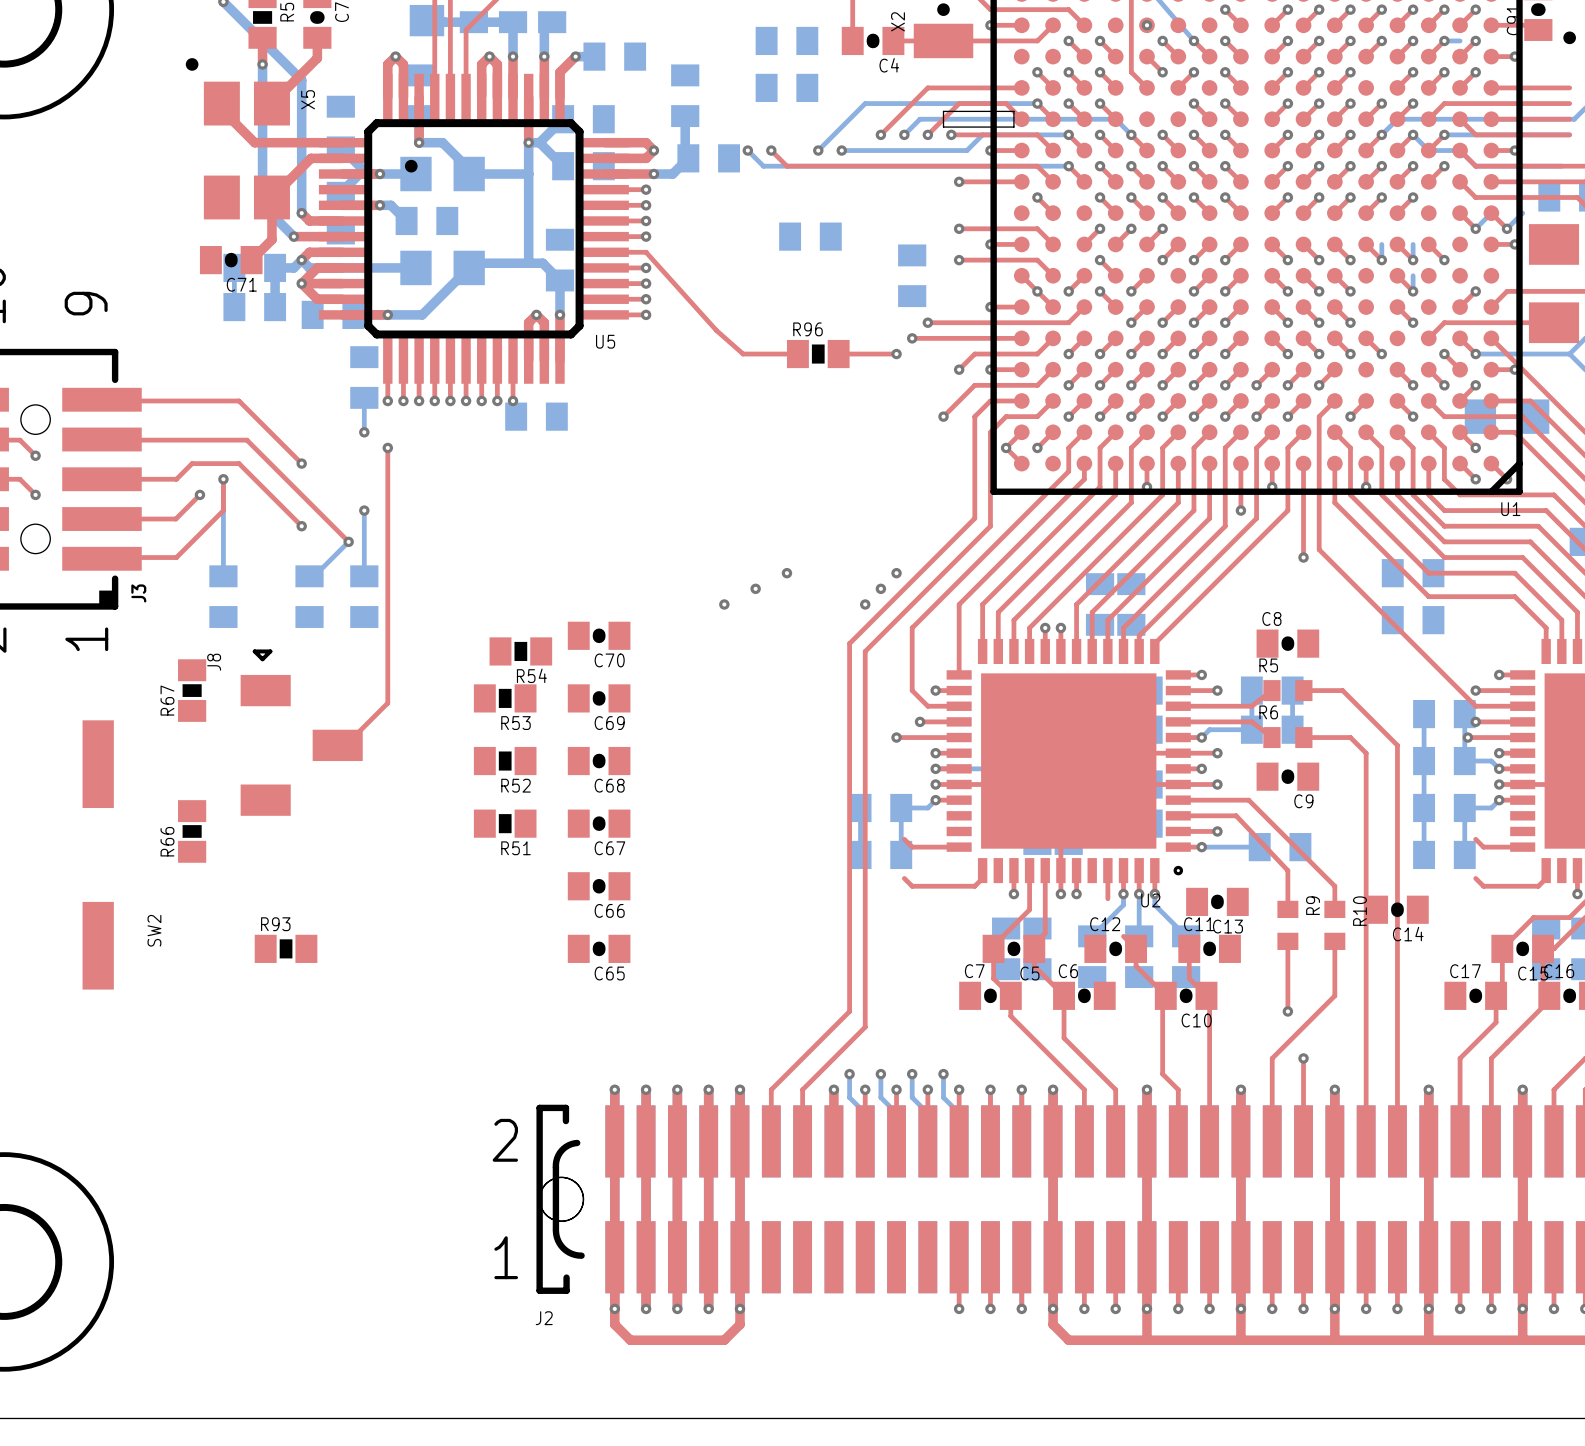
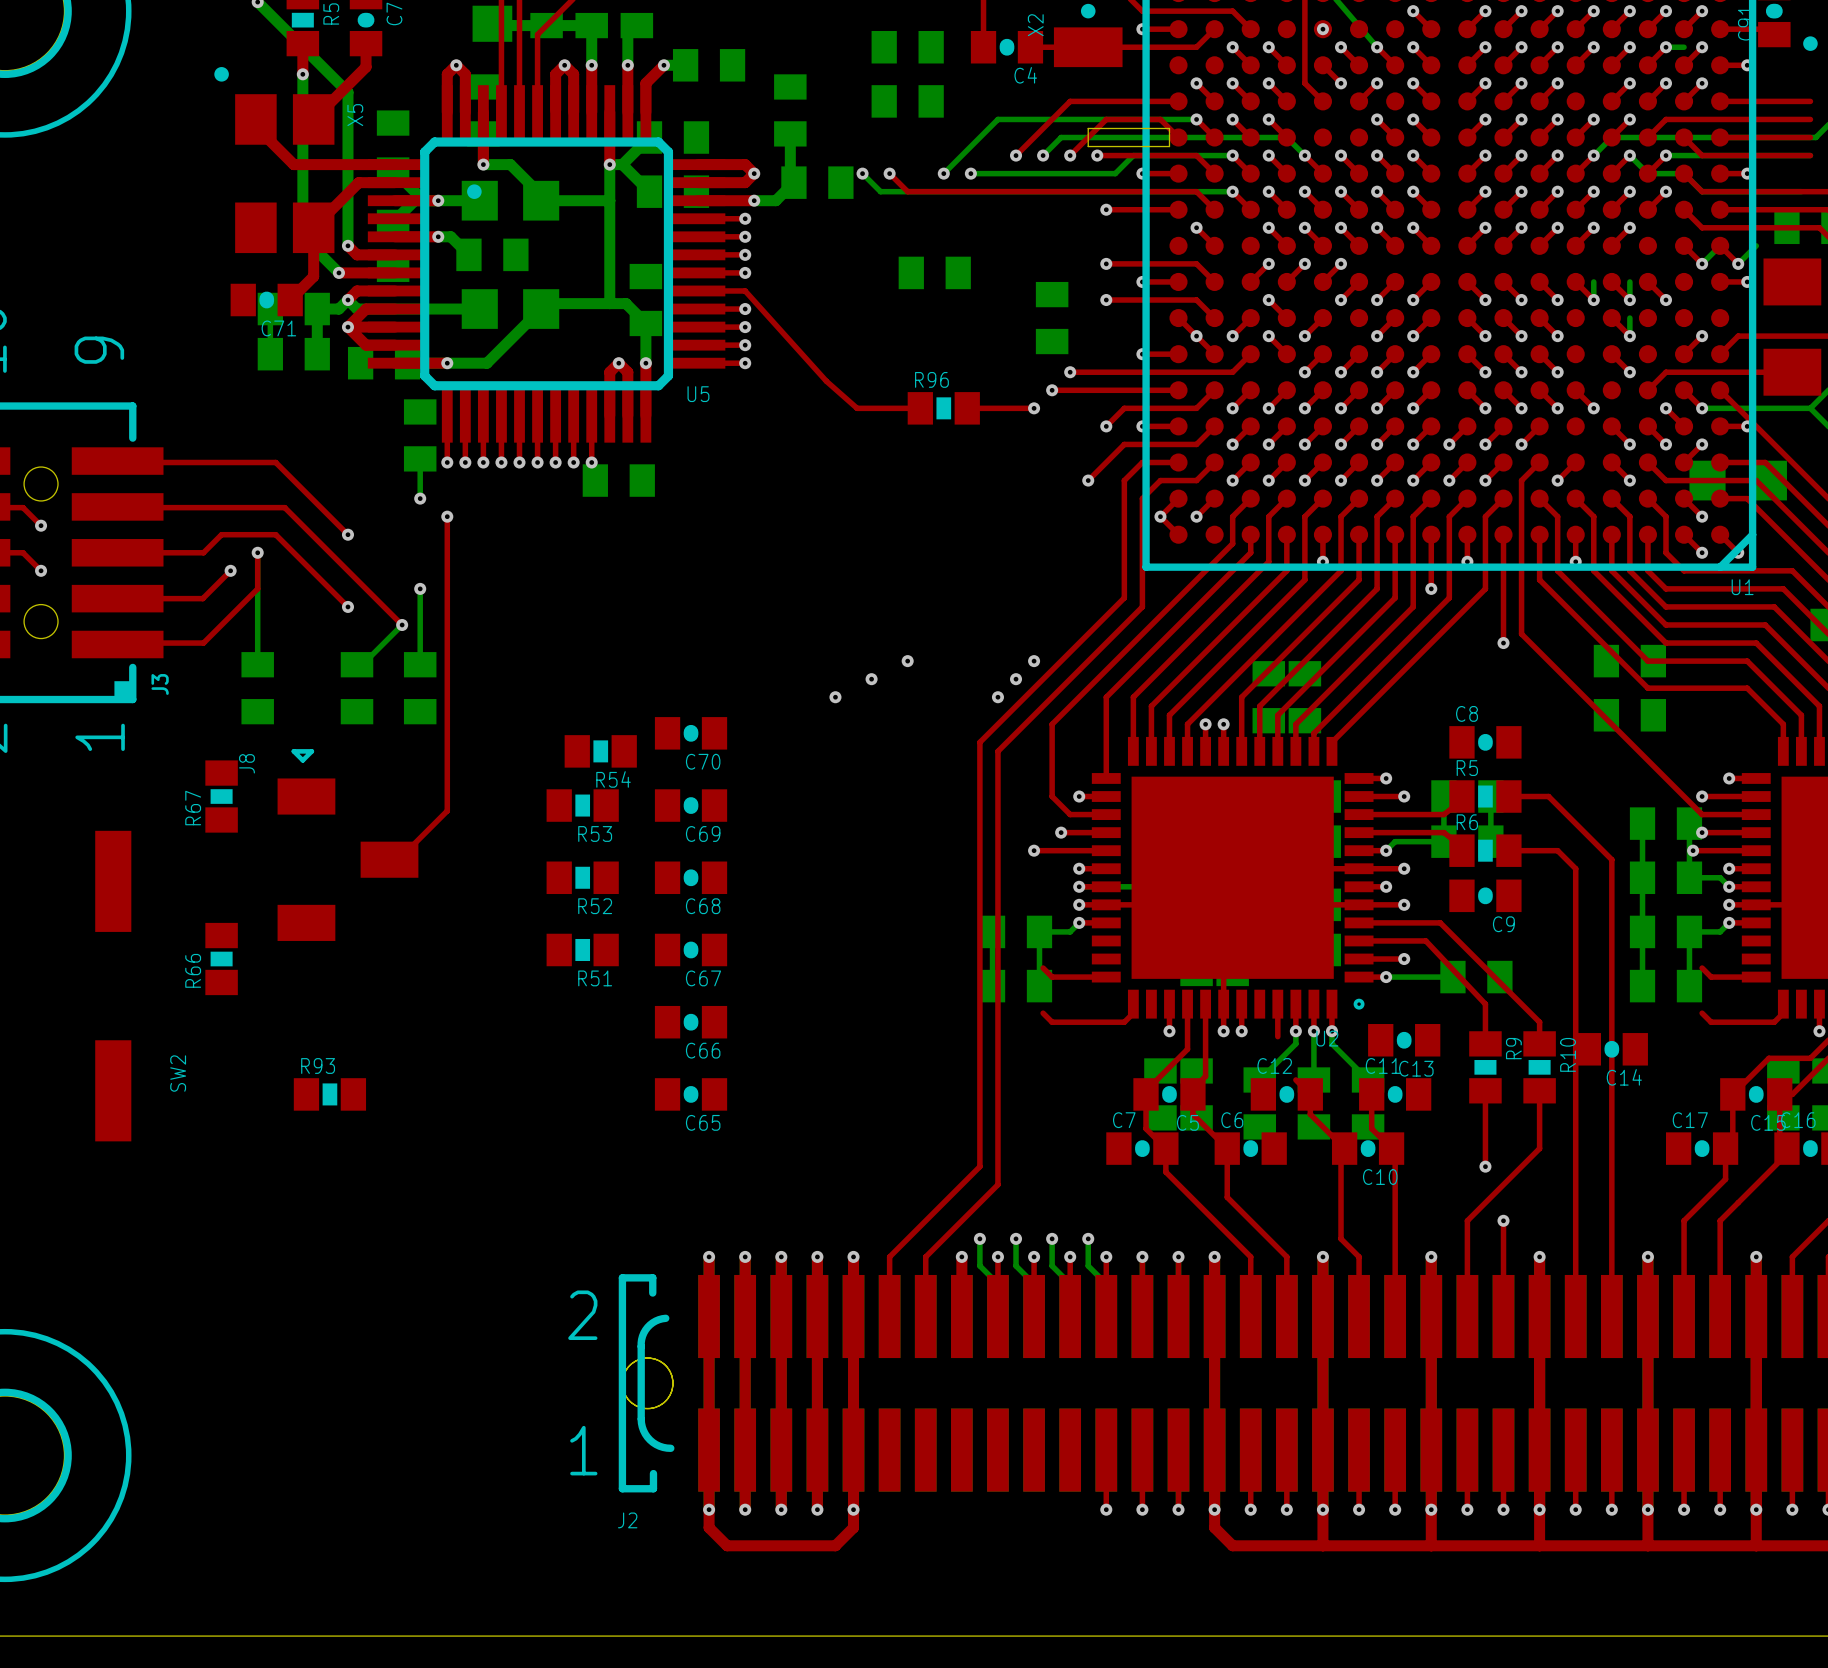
R5 footprint: [1263, 680, 1313, 702] -> [1449, 780, 1522, 813]
R6 footprint: [1263, 727, 1313, 749] -> [1449, 834, 1522, 867]
R9 footprint: [1277, 900, 1299, 950] -> [1469, 1031, 1502, 1104]
R10 footprint: [1324, 900, 1346, 950] -> [1523, 1031, 1556, 1104]

